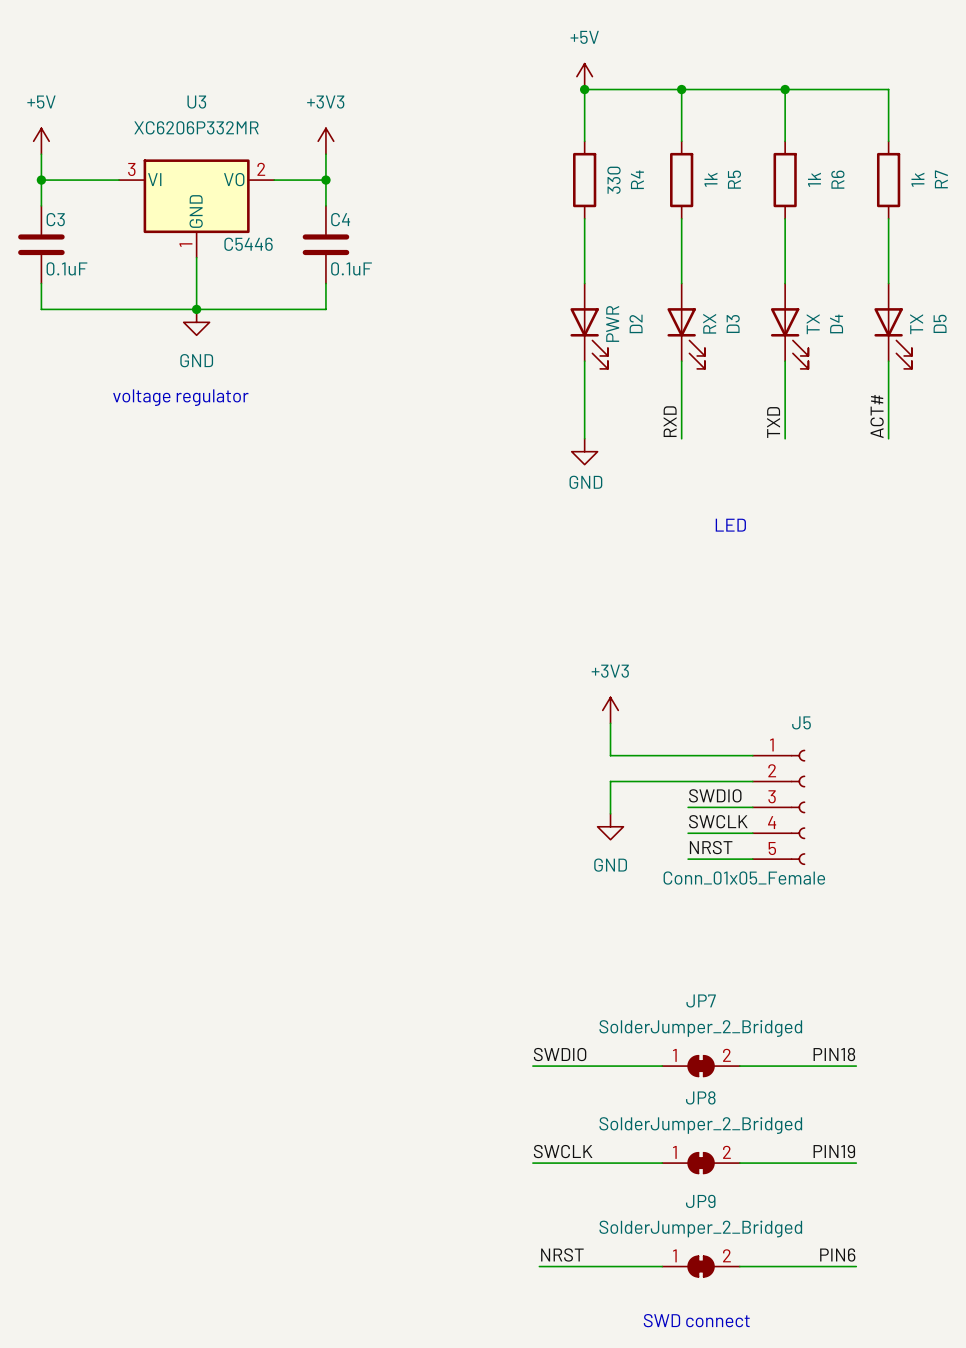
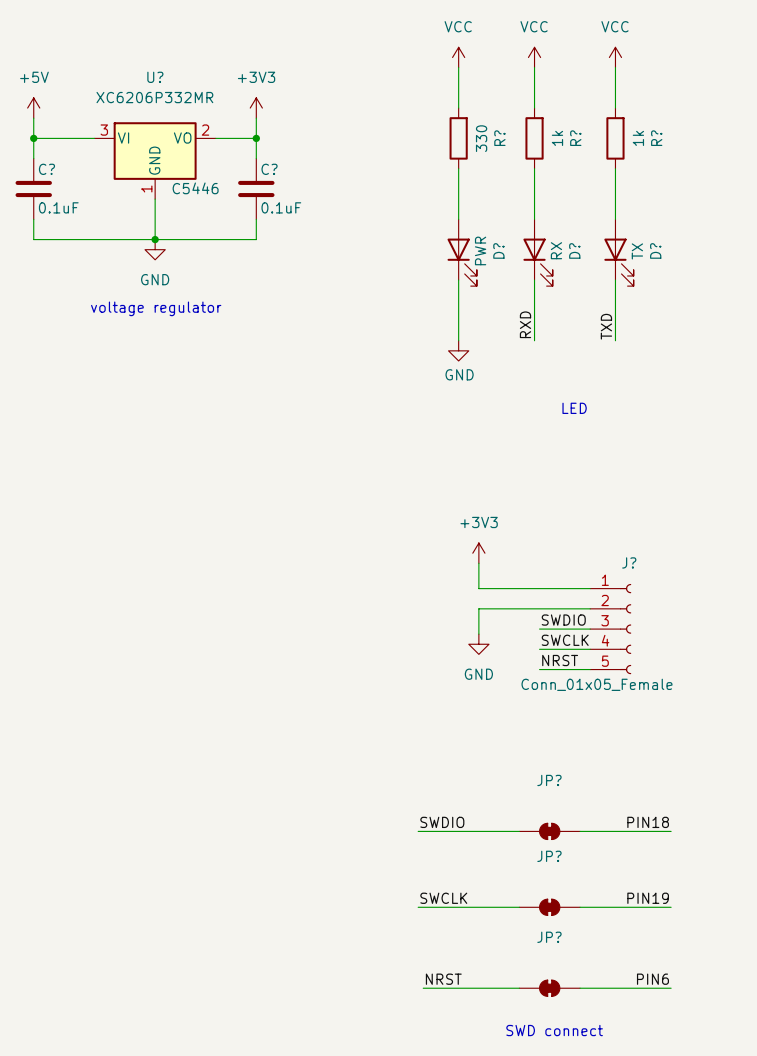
power symbol: +5V (584, 76) -> VCC (458, 57)
power symbol: none -> VCC (534, 57)
power symbol: none -> VCC (615, 57)
wire: (584, 89) (888, 89) (888, 141) -> none
junction: (584, 89) -> none
junction: (681, 89) -> none
junction: (785, 89) -> none
U3 name: U3 (196, 102) -> U? (155, 77)
R4 name: R4 (637, 179) -> R? (499, 138)
R5 name: R5 (734, 179) -> R? (575, 138)
R6 name: R6 (837, 179) -> R? (656, 138)
R7: 1k (888, 180) -> none
wire: (888, 218) (888, 283) -> none
C3 name: C3 (55, 219) -> C? (46, 169)
C4 name: C4 (340, 219) -> C? (269, 169)
D2 name: D2 (636, 323) -> D? (498, 250)
D4 name: D4 (836, 323) -> D? (655, 250)
D3 name: D3 (733, 324) -> D? (574, 250)
D5: TX (893, 326) -> none
wire: (888, 361) (888, 438) -> none
label: ACT# (877, 416) -> none
J5 name: J5 (801, 722) -> J? (629, 562)
JP7 name: JP7 (701, 1000) -> JP? (549, 780)
JP7 value: SolderJumper_2_Bridged (700, 1028) -> none
JP7 pin number: 1 (674, 1055) -> none
JP7 pin number: 2 (726, 1055) -> none
JP8 name: JP8 (700, 1097) -> JP? (549, 856)
JP8 value: SolderJumper_2_Bridged (700, 1125) -> none
JP8 pin number: 1 (674, 1152) -> none
JP8 pin number: 2 (726, 1152) -> none
JP9 name: JP9 (700, 1201) -> JP? (549, 937)
JP9 value: SolderJumper_2_Bridged (700, 1229) -> none
JP9 pin number: 1 (674, 1255) -> none
JP9 pin number: 2 (726, 1255) -> none

